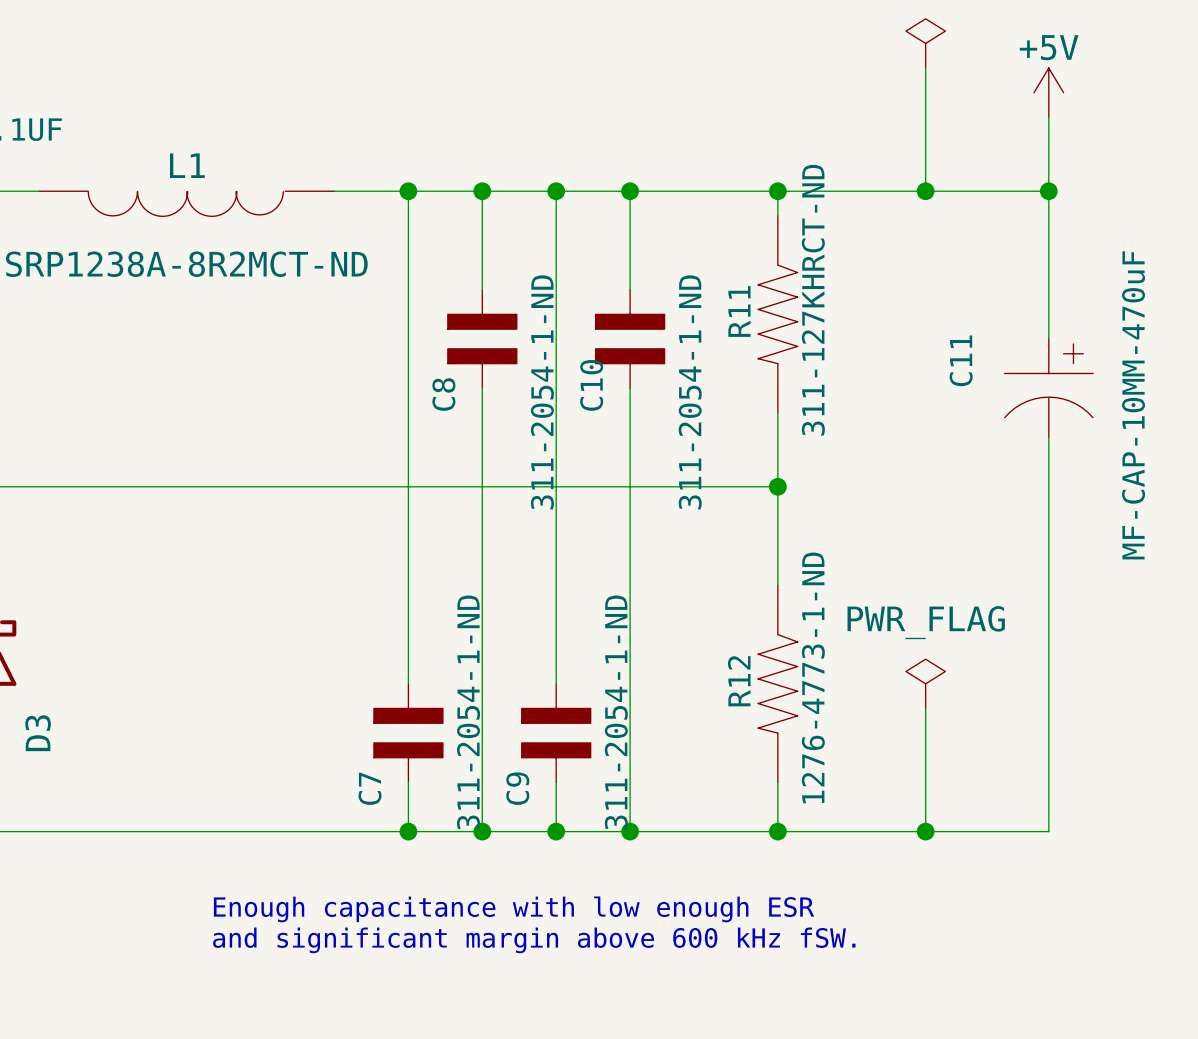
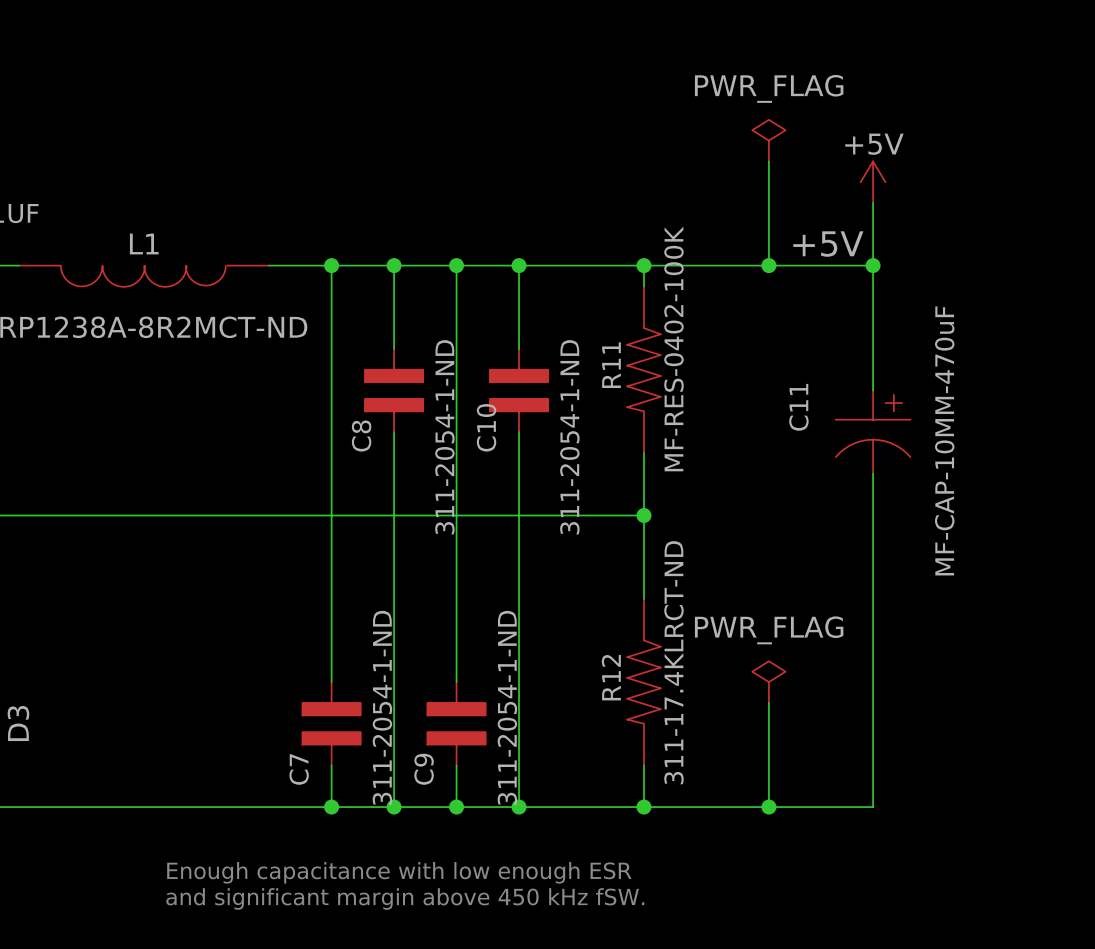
label: none -> +5V (828, 244)
R11 value: 311-127KHRCT-ND (813, 300) -> MF-RES-0402-100K (673, 349)
R12 value: 1276-4773-1-ND (813, 677) -> 311-17.4KLRCT-ND (673, 662)
text: and significant margin above 600 kHz fSW. (534, 940) -> and significant margin above 450 kHz fSW. (405, 898)

